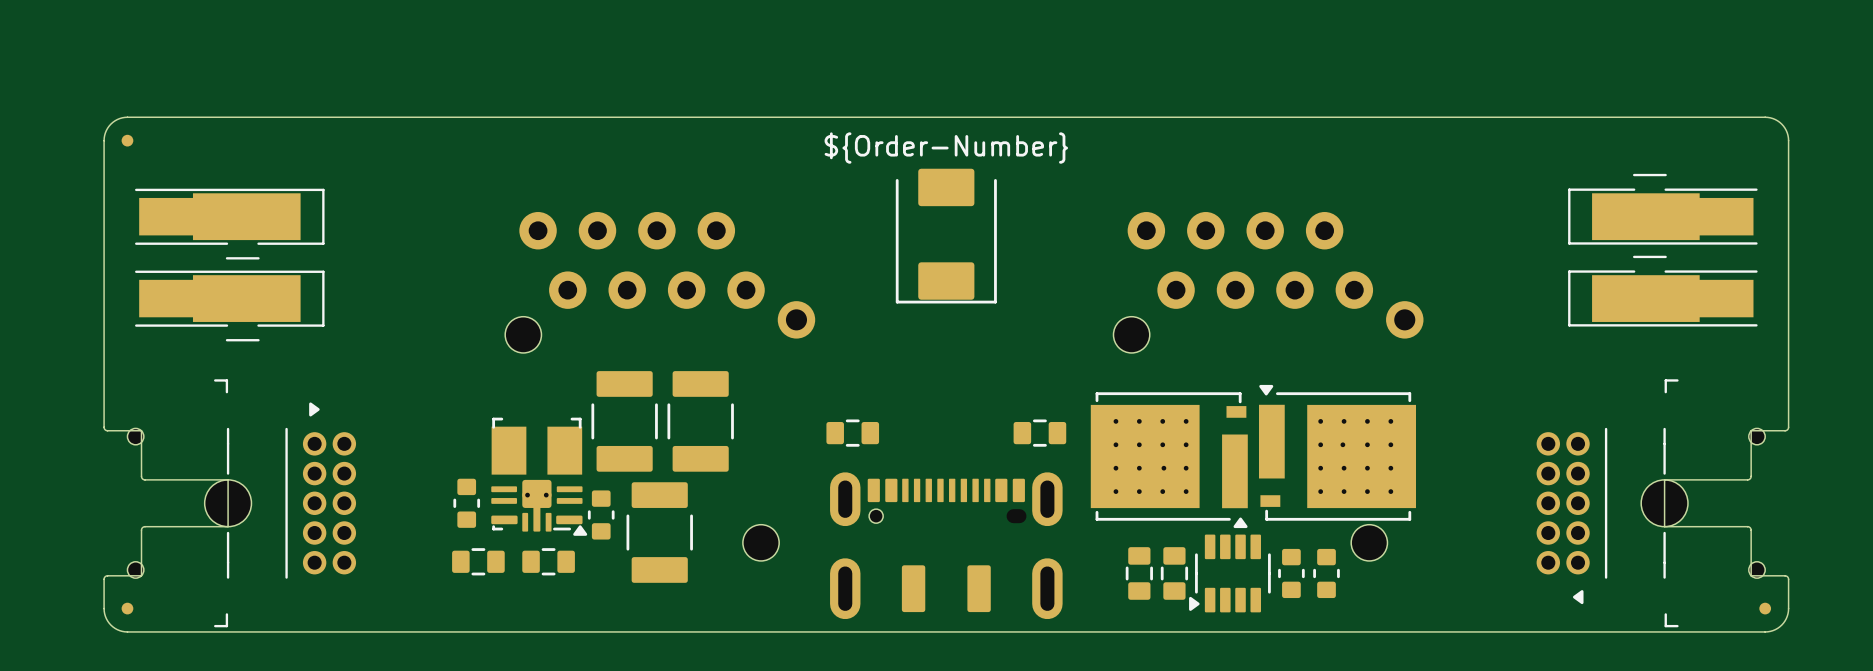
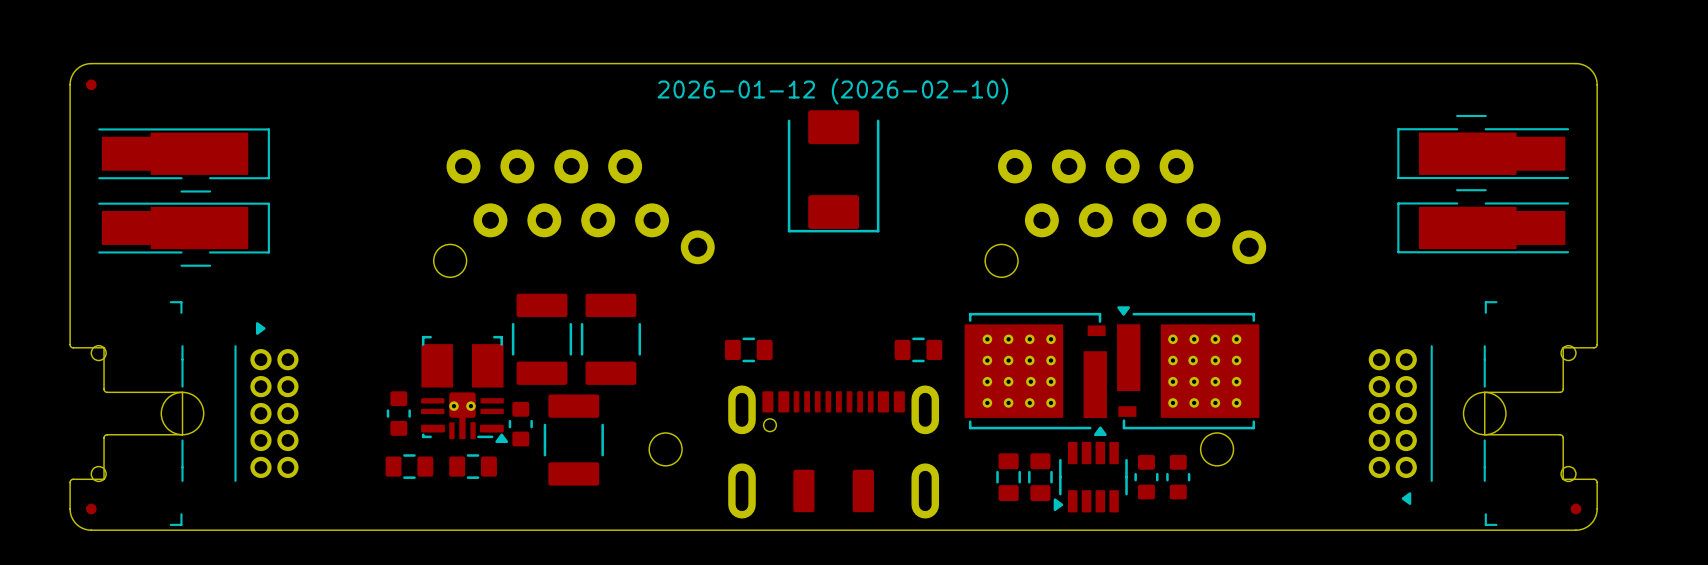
drawing shape: [824, 132, 1069, 164] -> [657, 78, 1009, 105]

